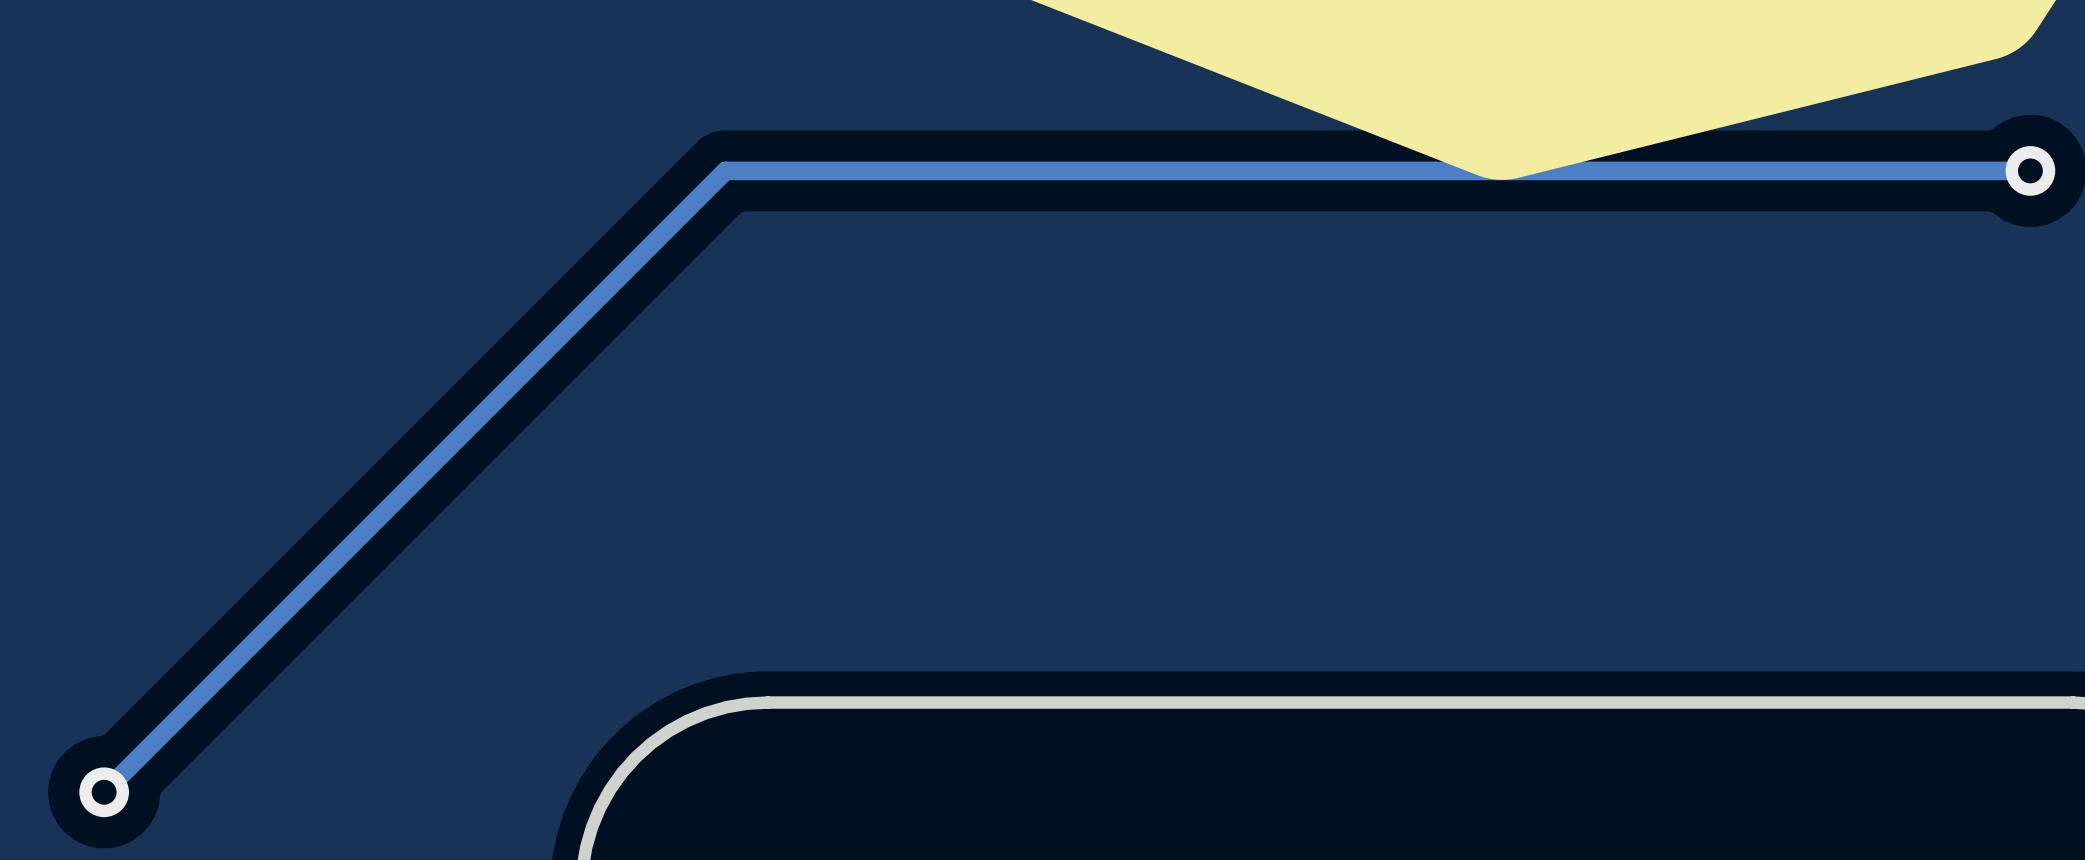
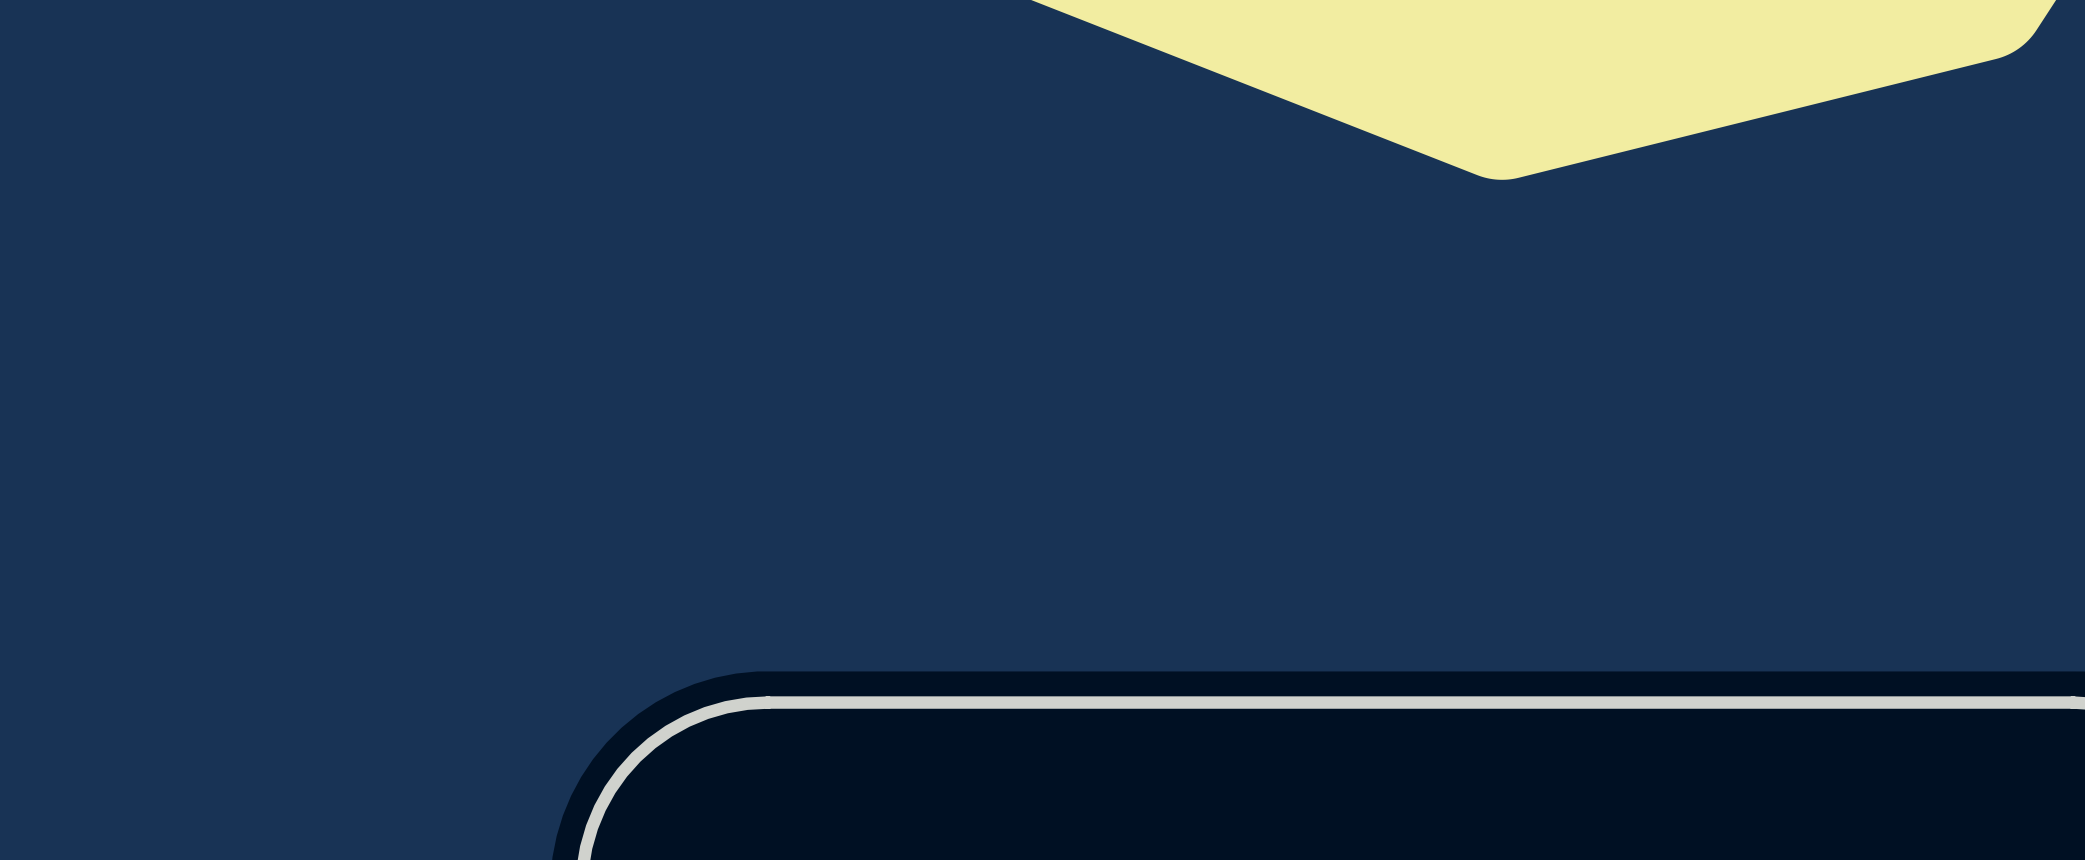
track: (2030, 170) (725, 170) (104, 792) -> none
via: (2030, 170) -> none
via: (104, 792) -> none

